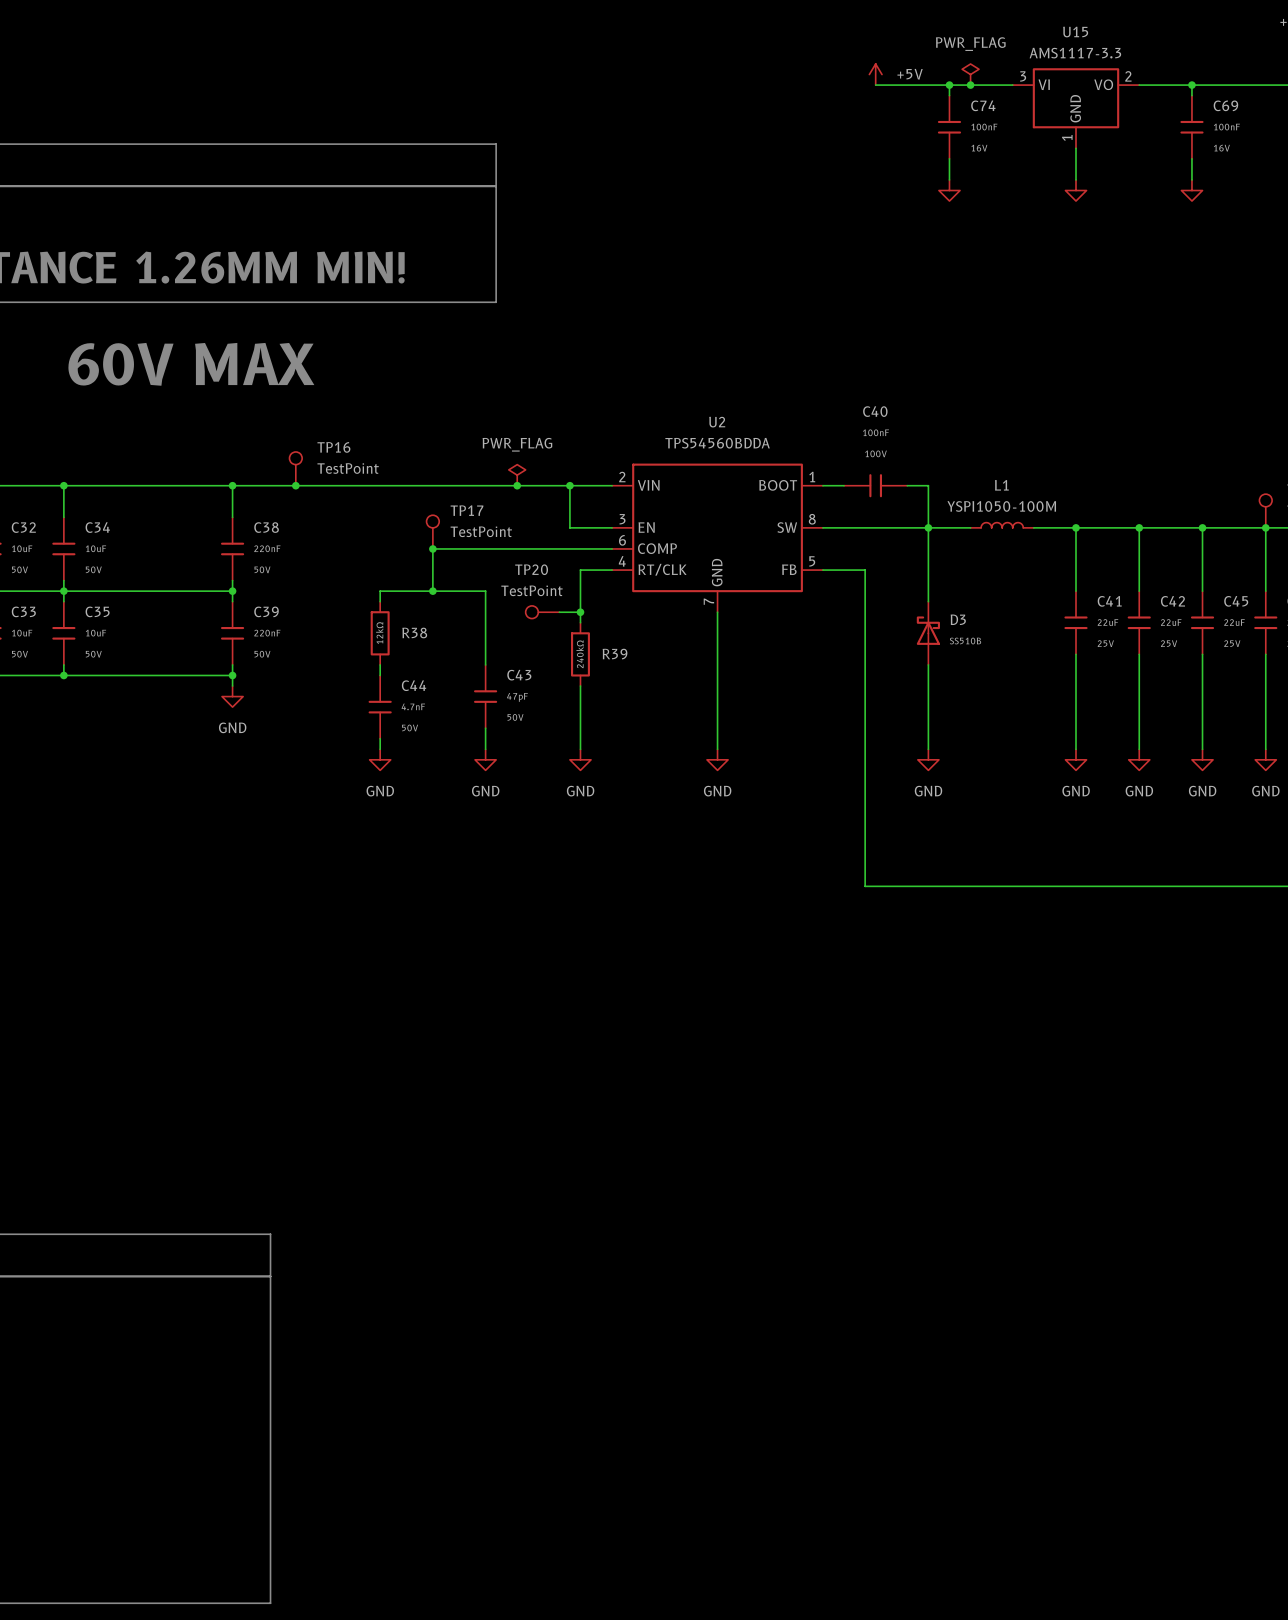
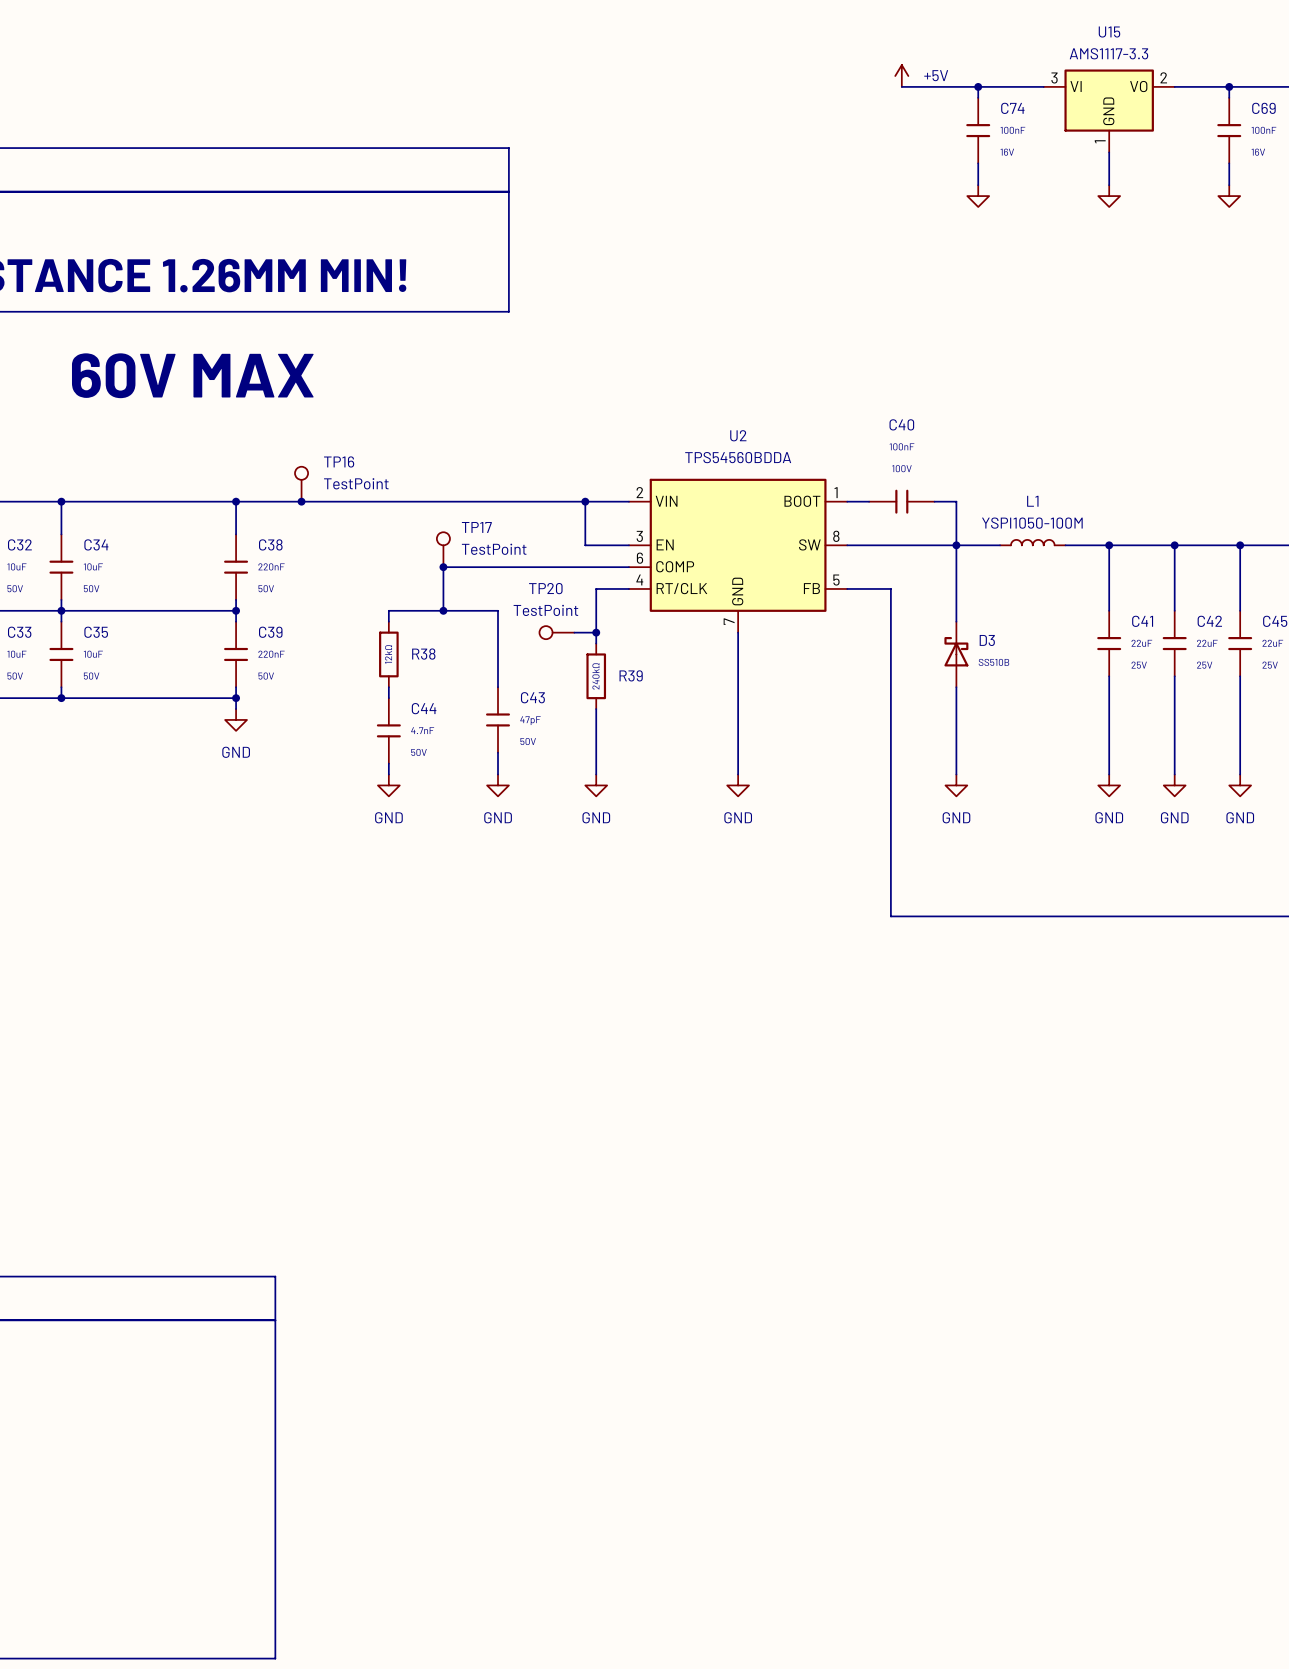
power symbol: PWR_FLAG (970, 74) -> none
junction: (970, 85) -> none
power symbol: PWR_FLAG (517, 475) -> none
junction: (517, 485) -> none

